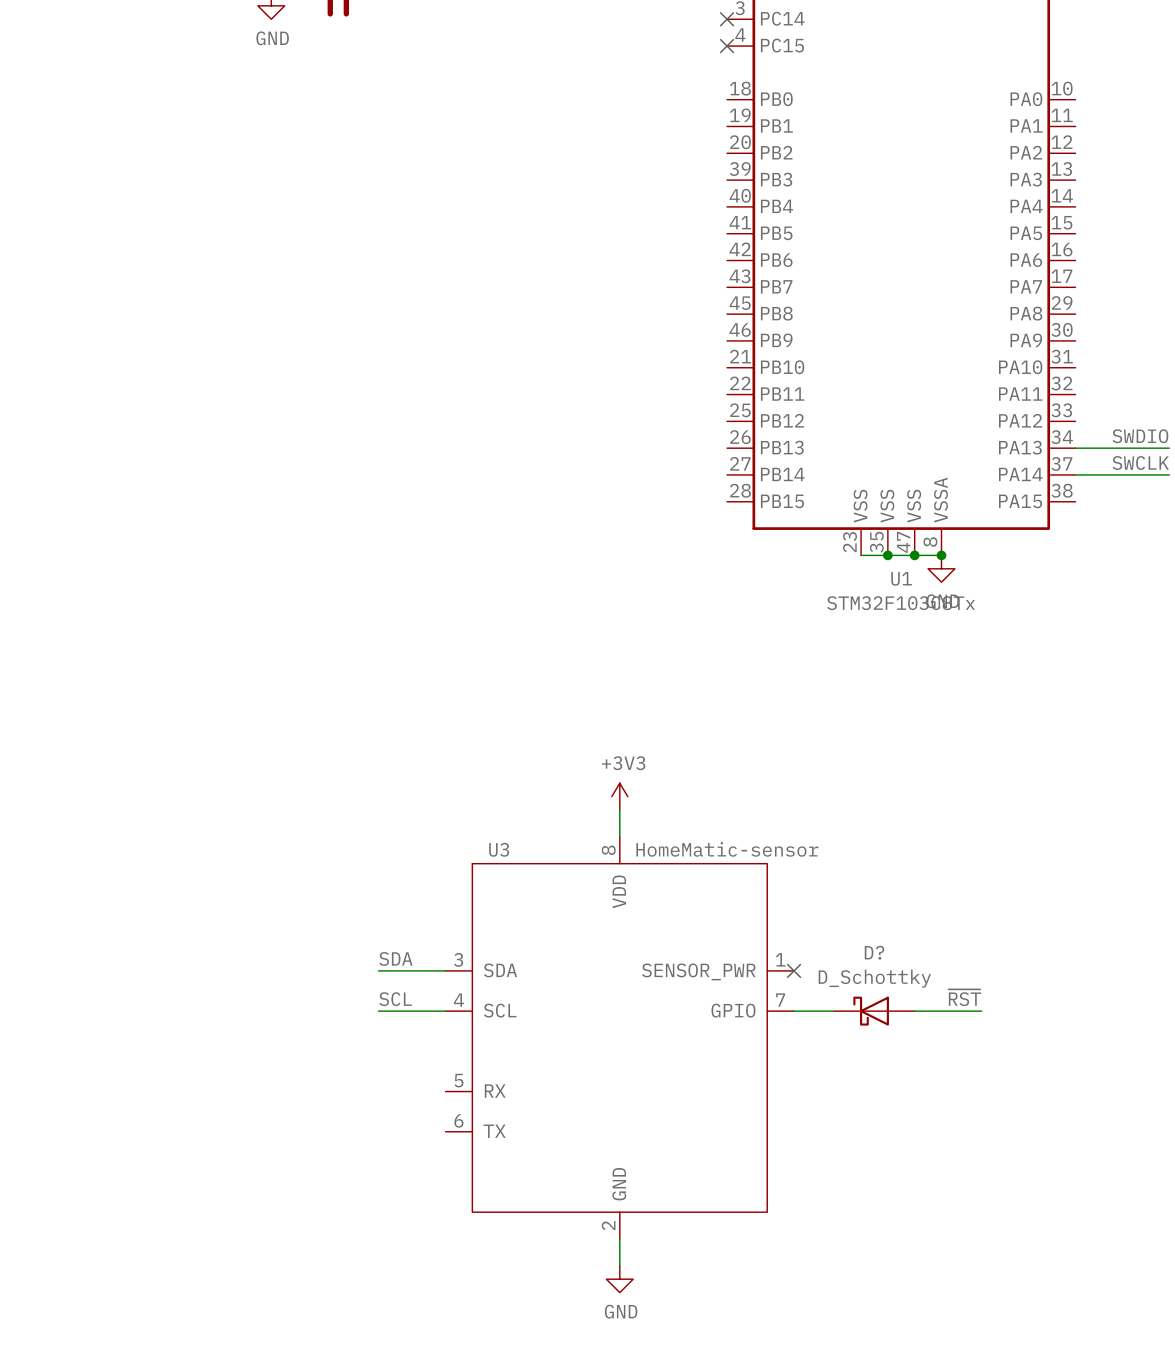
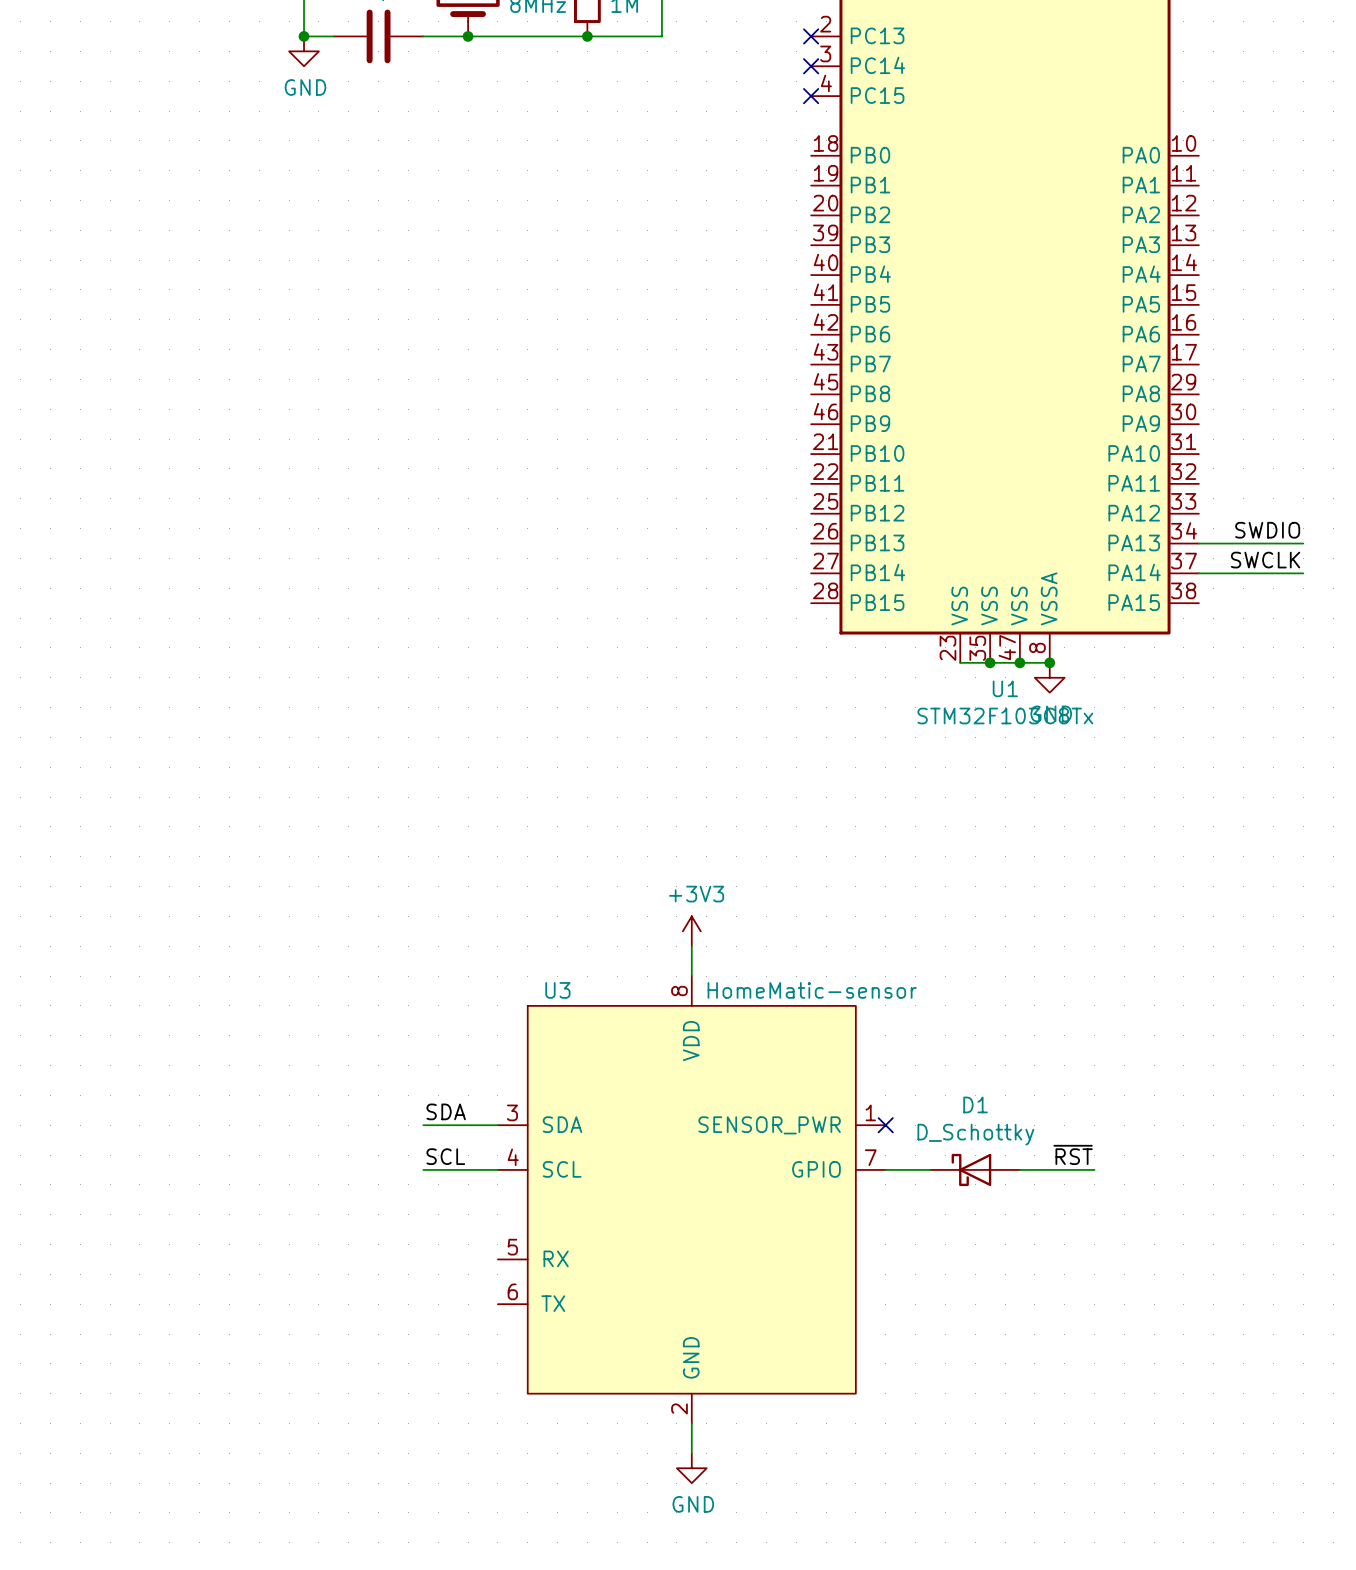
D? name: D? (874, 952) -> D1 (975, 1104)

